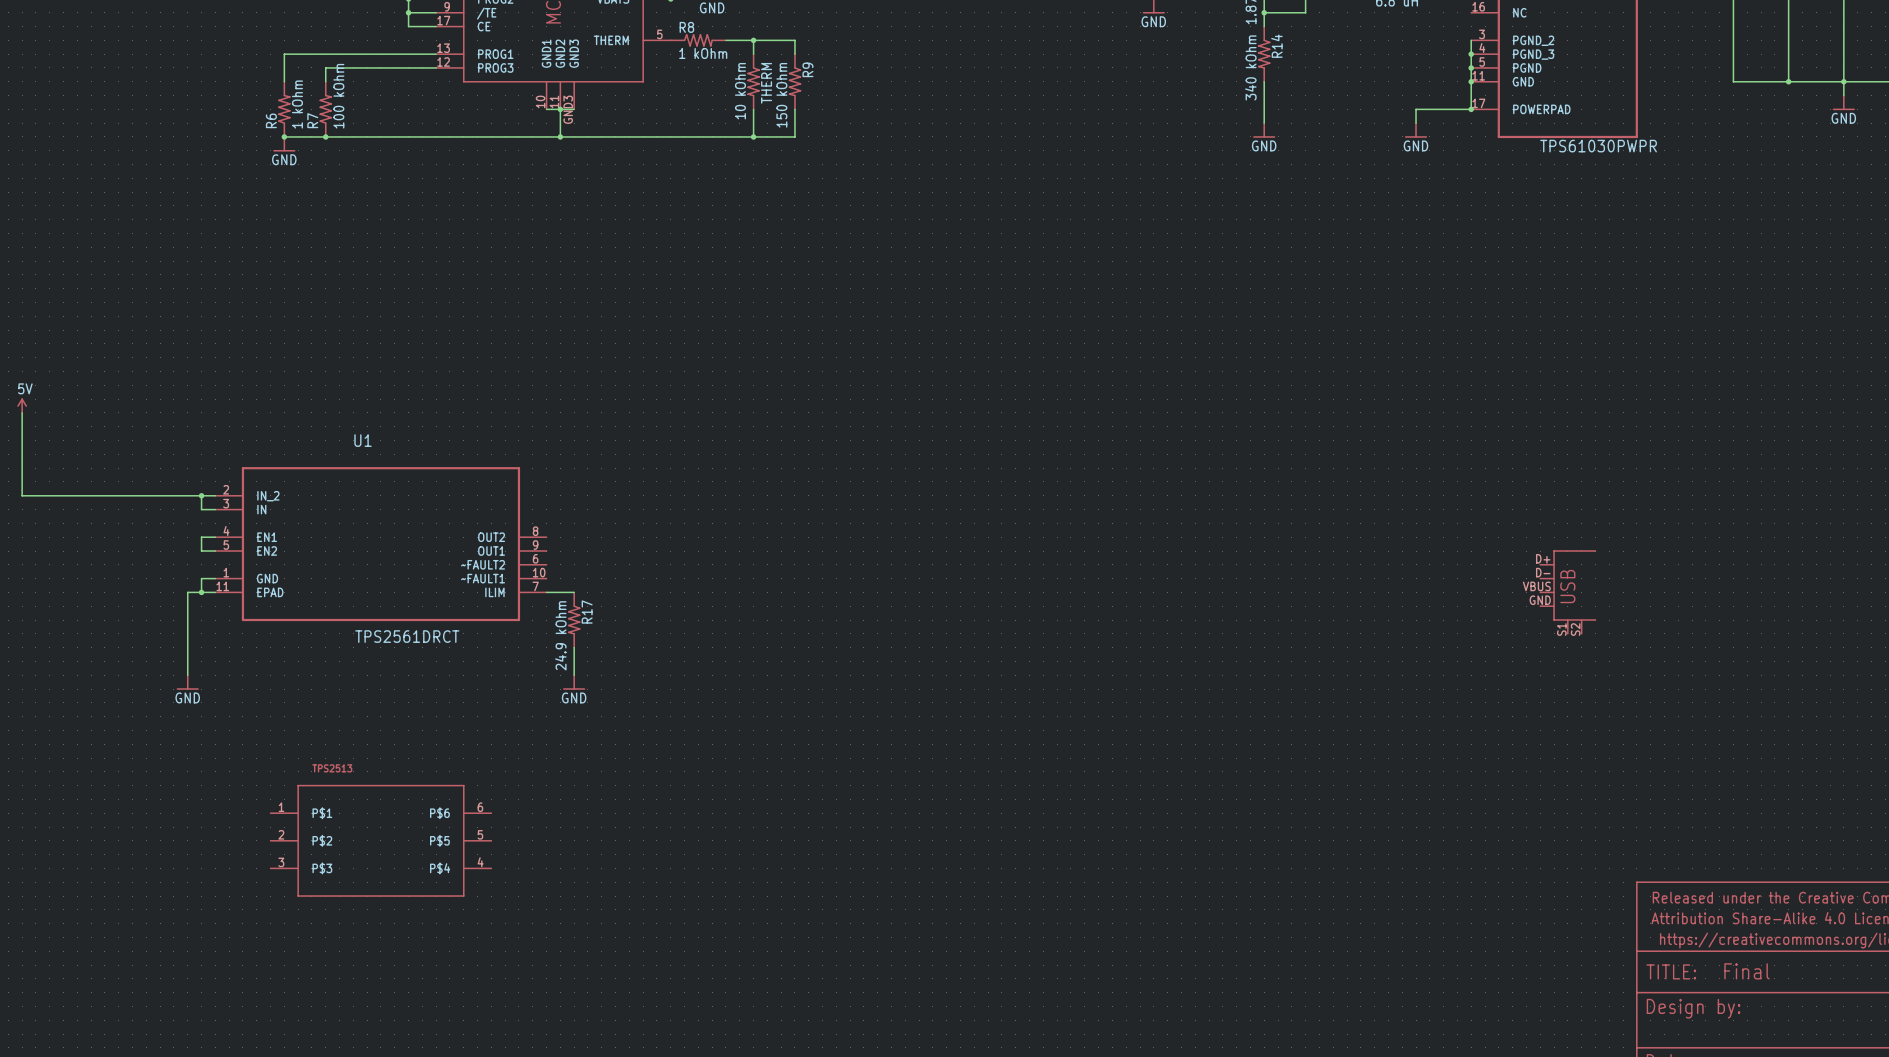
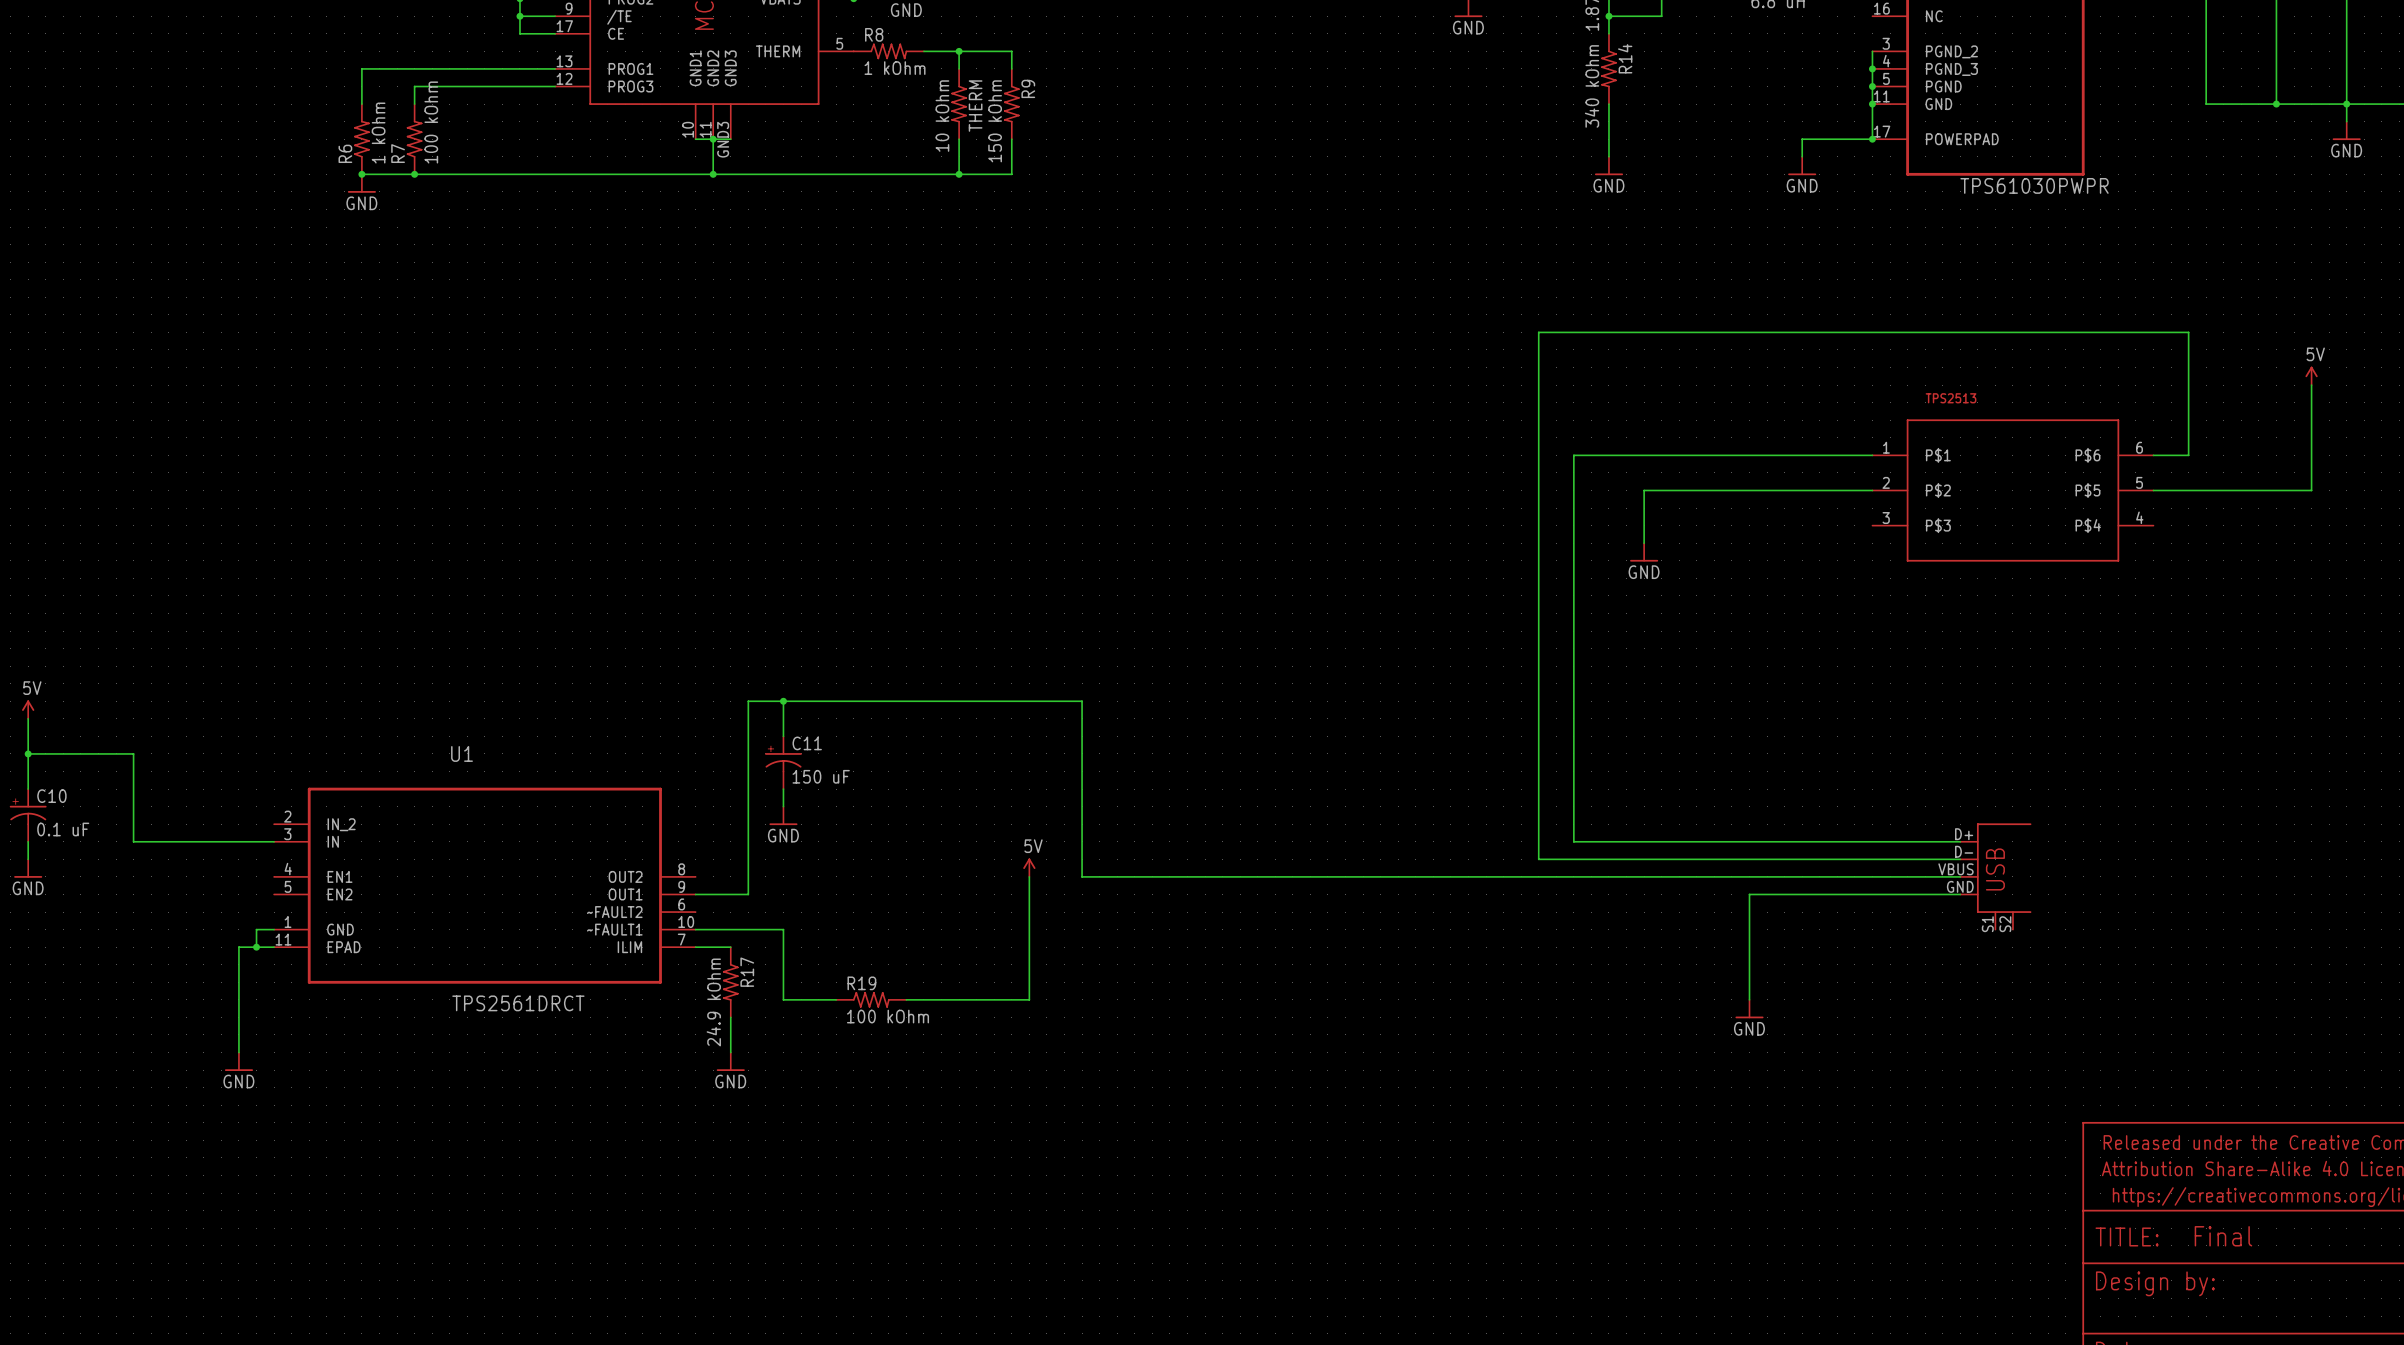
power symbol: none -> 5V (2311, 375)
wire: none -> (2311, 385) (2311, 490) (2153, 490)
wire: none -> (1872, 455) (1573, 455) (1573, 841) (1960, 841)
wire: none -> (2153, 455) (2188, 455) (2188, 332) (1538, 332) (1538, 859) (1960, 859)
wire: none -> (1872, 490) (1644, 490) (1644, 543)
power symbol: 5V (22, 405) -> none
wire: (22, 412) (22, 495) (215, 495) -> none
power symbol: none -> GND (1644, 552)
wire: (201, 495) (201, 509) (215, 509) -> none
junction: (201, 495) -> none
wire: (215, 537) (201, 537) (201, 551) (215, 551) -> none
U1 position: (380, 544) -> (484, 885)
junction: none -> (783, 701)
power symbol: none -> 5V (28, 709)
wire: none -> (28, 718) (28, 789)
wire: (215, 578) (201, 578) (201, 592) -> none
wire: none -> (28, 753) (133, 753) (133, 841) (274, 841)
junction: none -> (28, 753)
junction: (201, 592) -> none
wire: (215, 592) (187, 592) (187, 675) -> none
wire: (546, 592) (574, 592) -> none
part position: (1568, 592) -> (1995, 876)
C11: none -> 150 uF (783, 762)
R17 position: (574, 620) -> (730, 982)
wire: none -> (783, 789) (783, 806)
C10: none -> 0.1 uF (28, 815)
wire: (574, 647) (574, 675) -> (783, 701) (783, 736)
wire: none -> (28, 841) (28, 859)
power symbol: none -> 5V (1029, 867)
power symbol: none -> GND (28, 868)
power symbol: GND (187, 682) -> none
power symbol position: GND (574, 682) -> GND (783, 815)
wire: none -> (1029, 876) (1029, 999) (906, 999)
wire: none -> (1960, 876) (1082, 876) (1082, 701) (748, 701) (748, 894) (695, 894)
wire: none -> (1960, 894) (1749, 894) (1749, 999)
wire: none -> (274, 929) (256, 929) (256, 947)
wire: none -> (695, 929) (783, 929) (783, 999) (836, 999)
junction: none -> (256, 947)
wire: none -> (274, 947) (238, 947) (238, 1052)
wire: none -> (695, 947) (730, 947)
R19: none -> 100 kOhm (871, 999)
power symbol: none -> GND (1749, 1009)
wire: none -> (730, 1017) (730, 1052)
power symbol: none -> GND (238, 1061)
power symbol: none -> GND (730, 1061)
TPS2513 position: (380, 840) -> (2012, 490)

